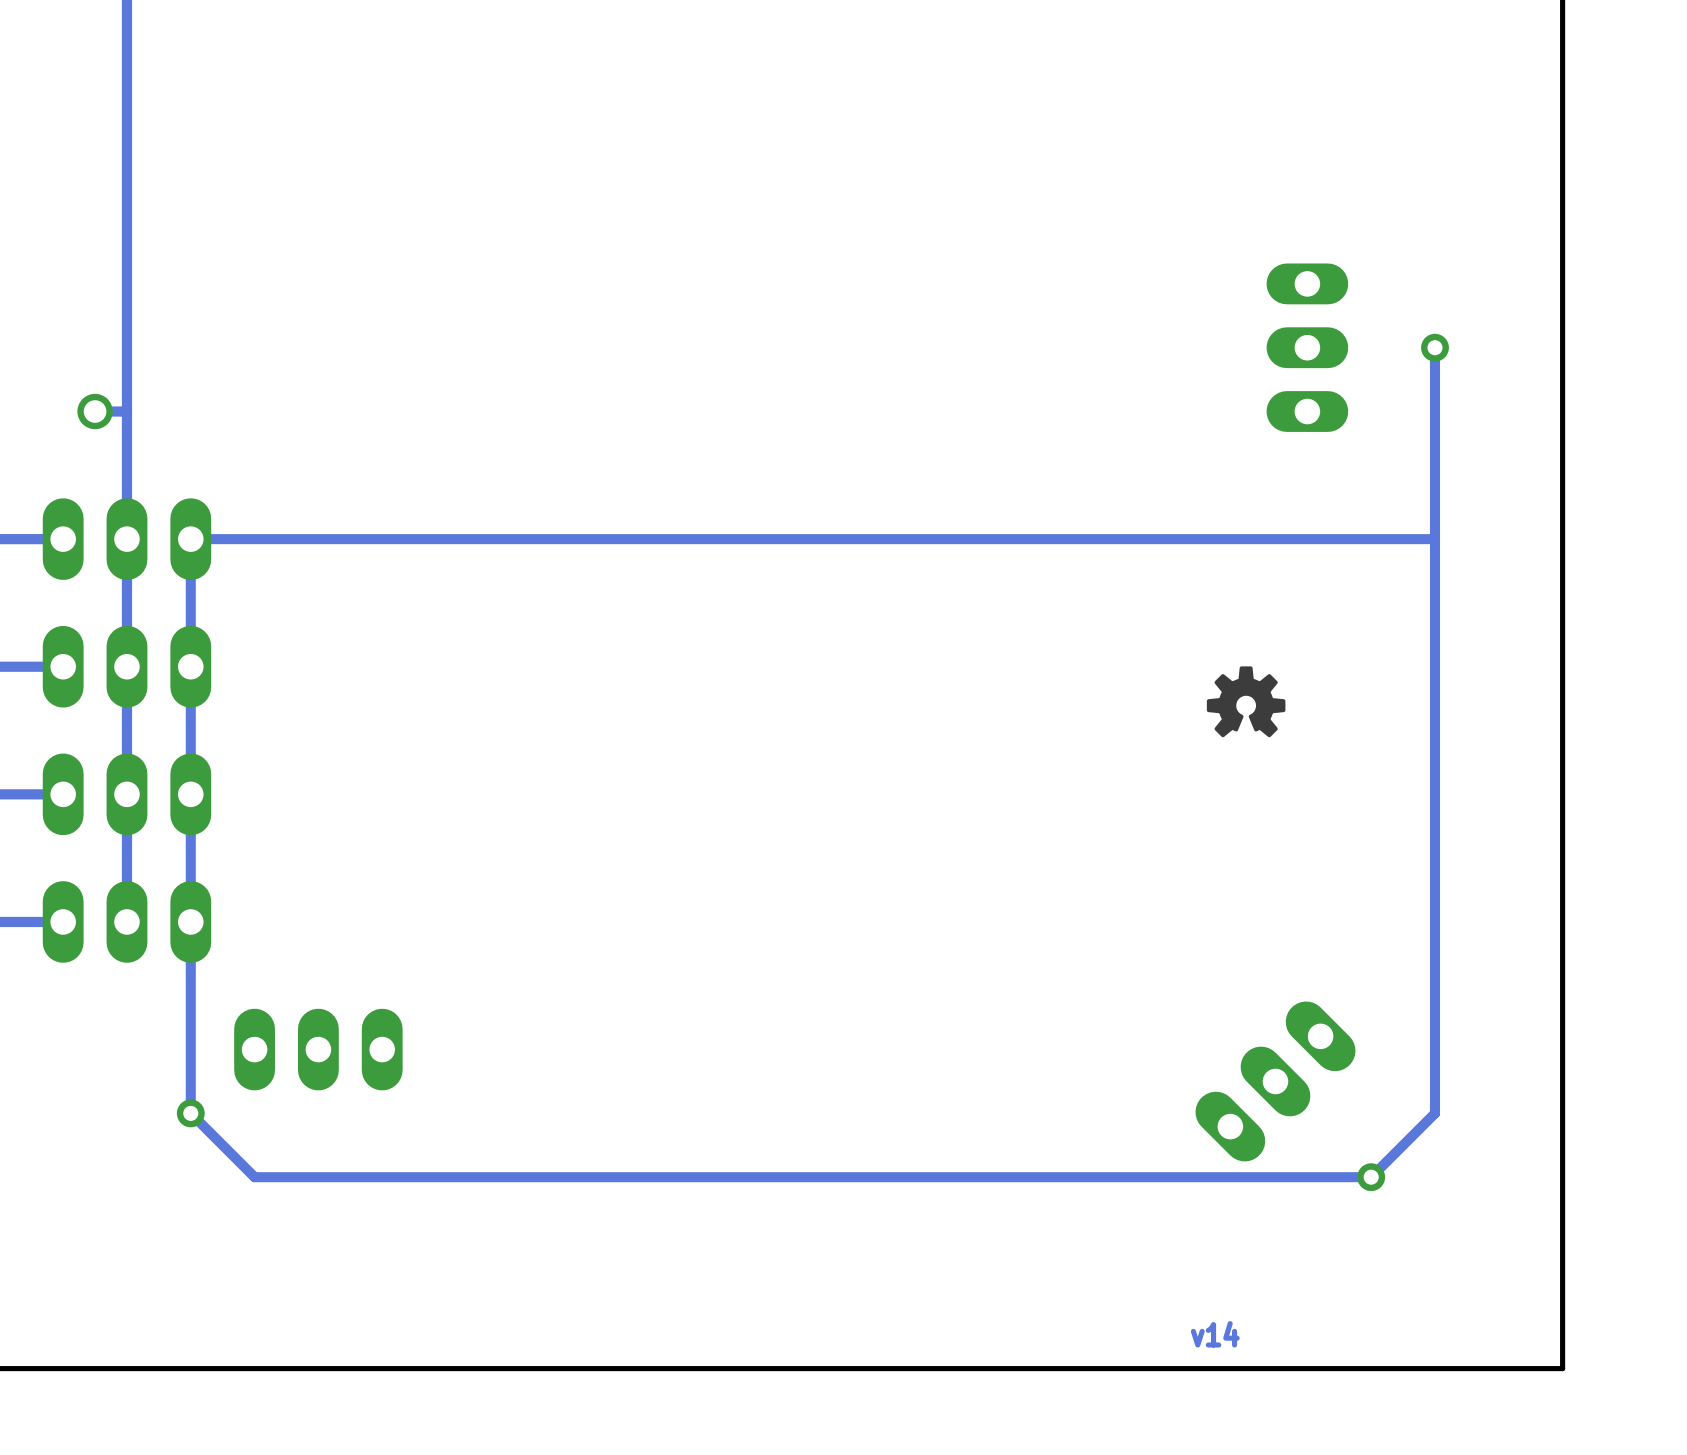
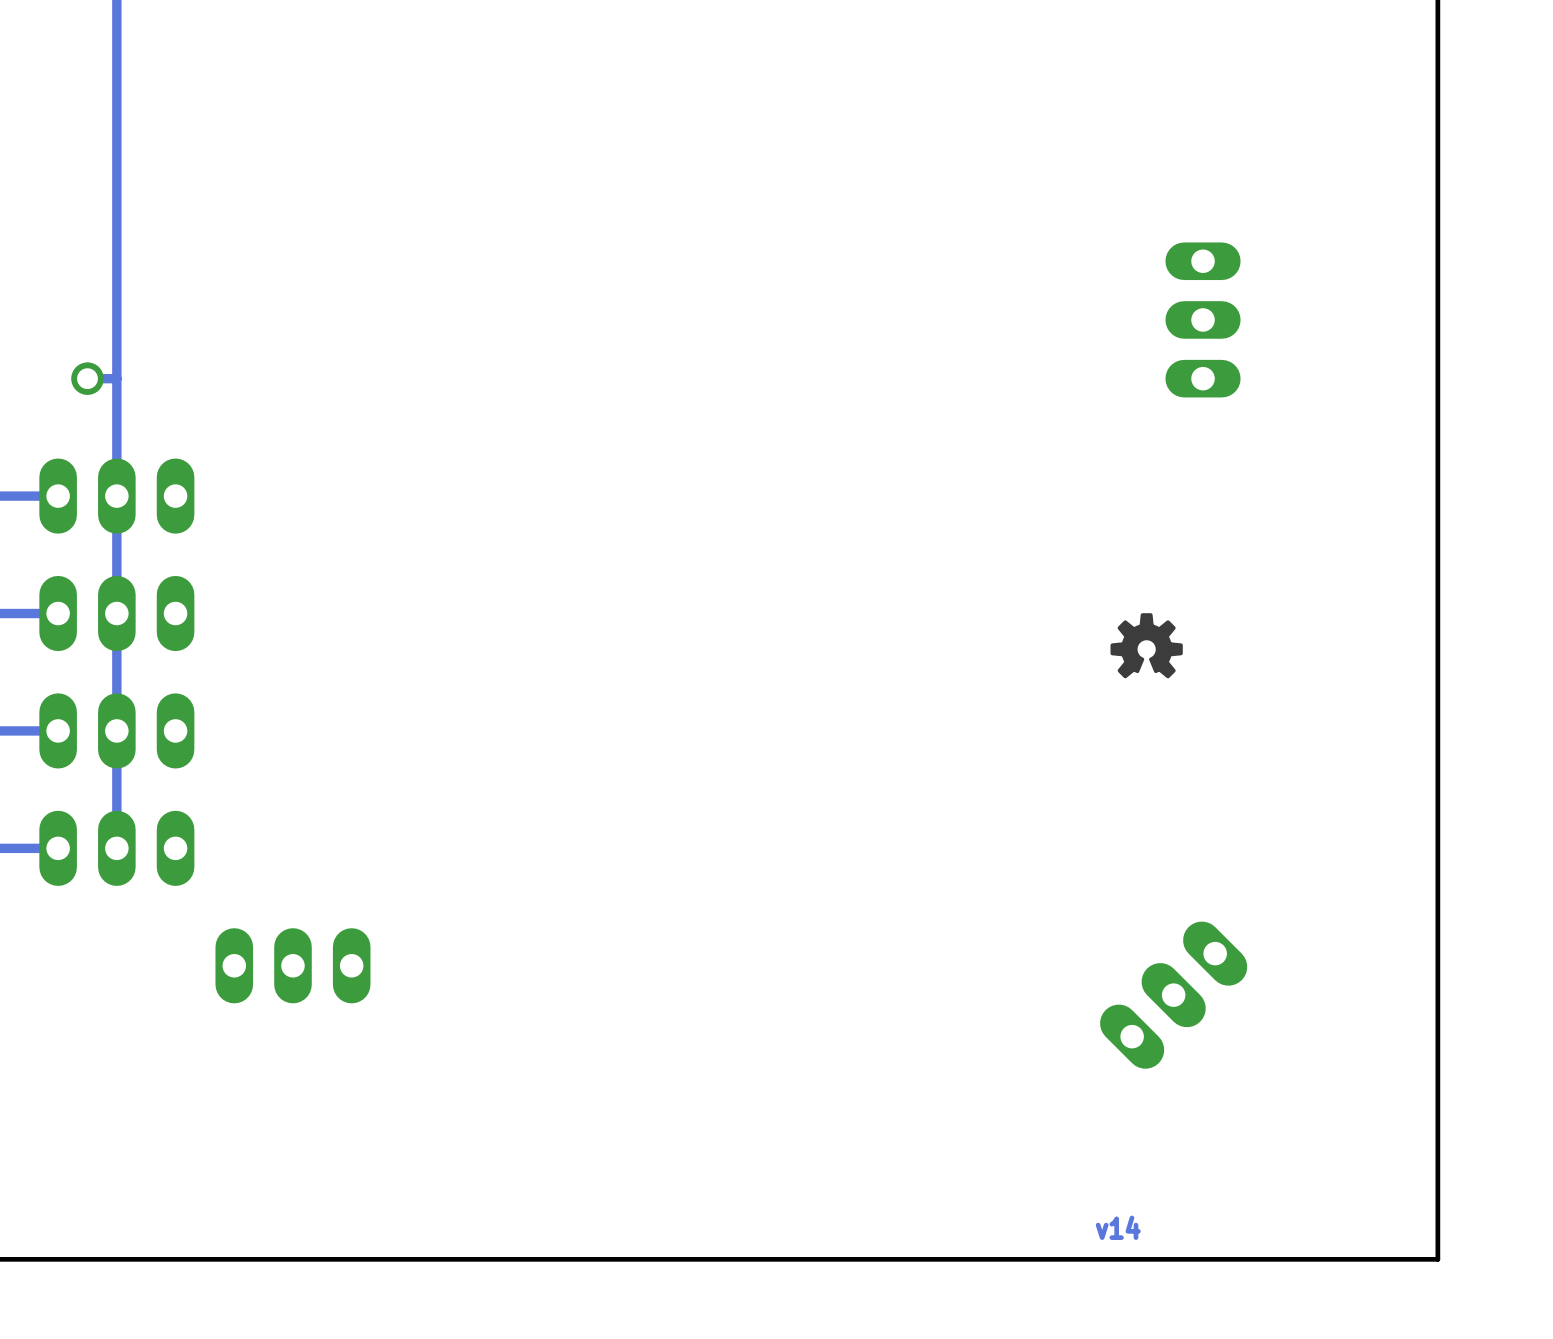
track: (1434, 347) (1434, 1113) (1371, 1177) (254, 1177) (190, 1113) (190, 539) (1434, 539) -> none
via: (1434, 347) -> none
via: (190, 1113) -> none
via: (1371, 1177) -> none

